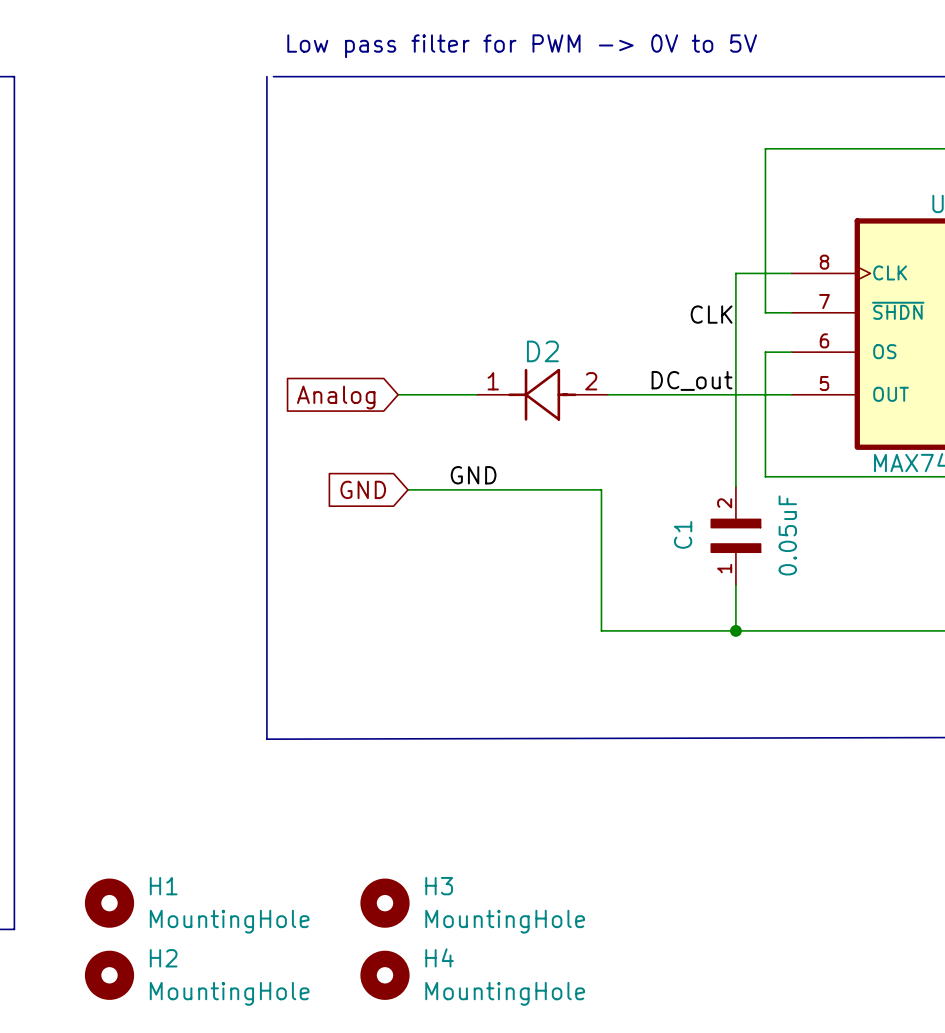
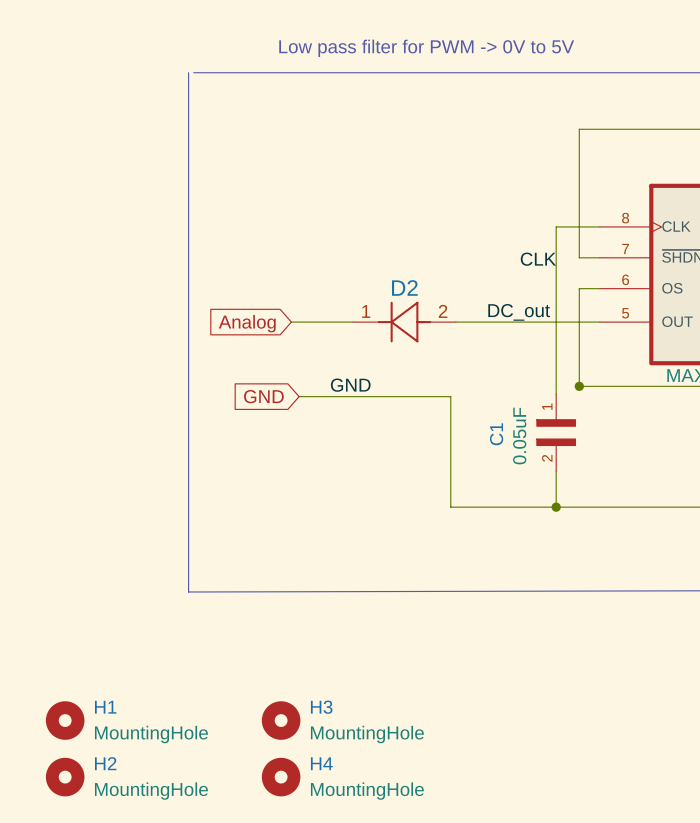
junction: none -> (579, 386)
C1 name position: C1 (683, 534) -> C1 (496, 434)
C1 rotation: 0° (735, 535) -> 180° (556, 432)

